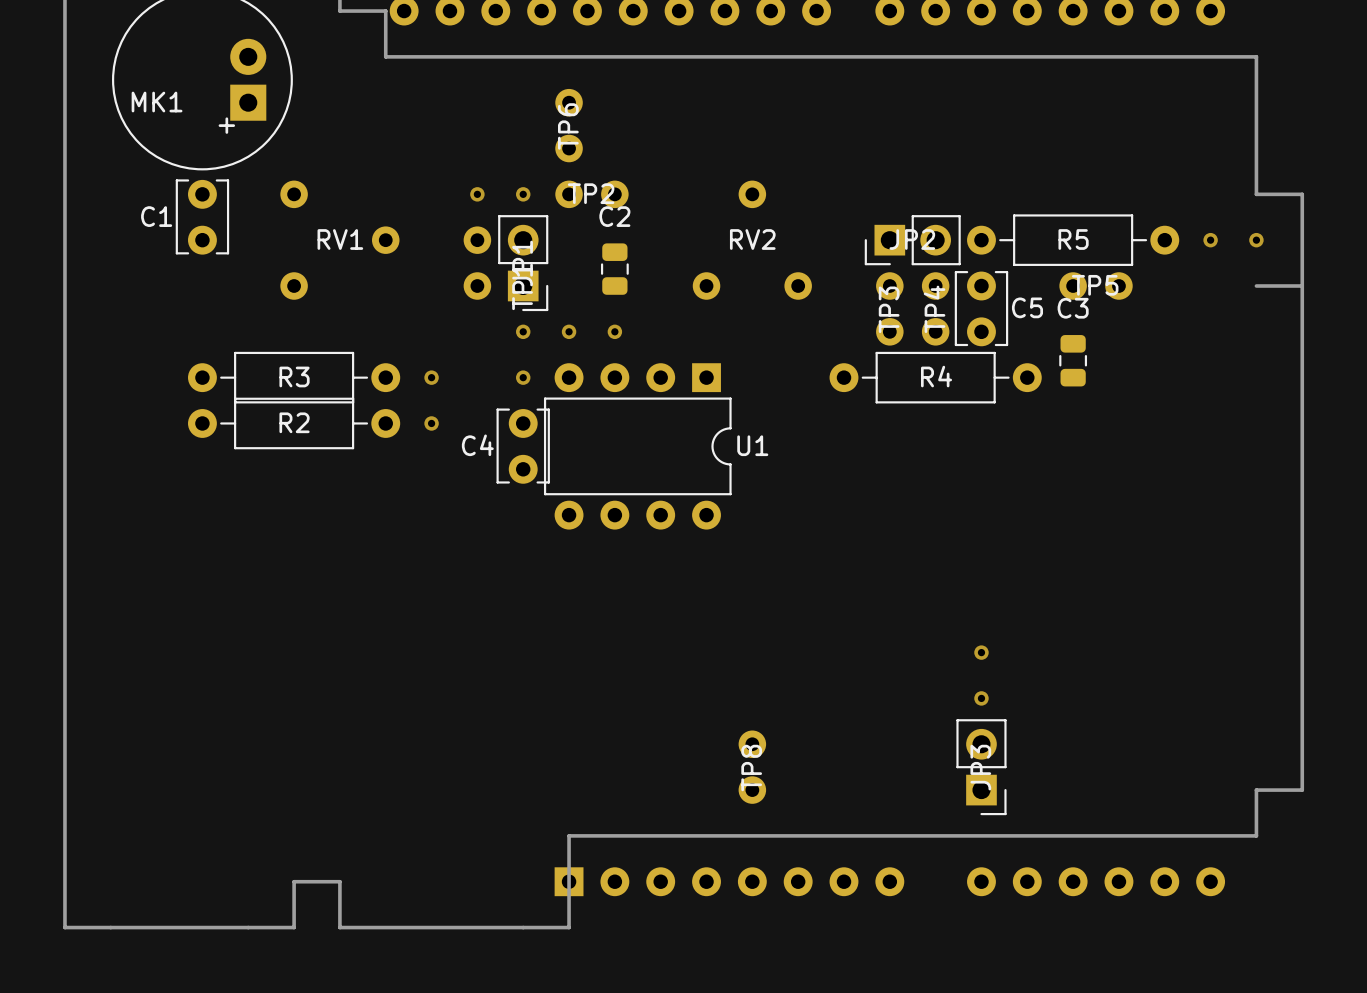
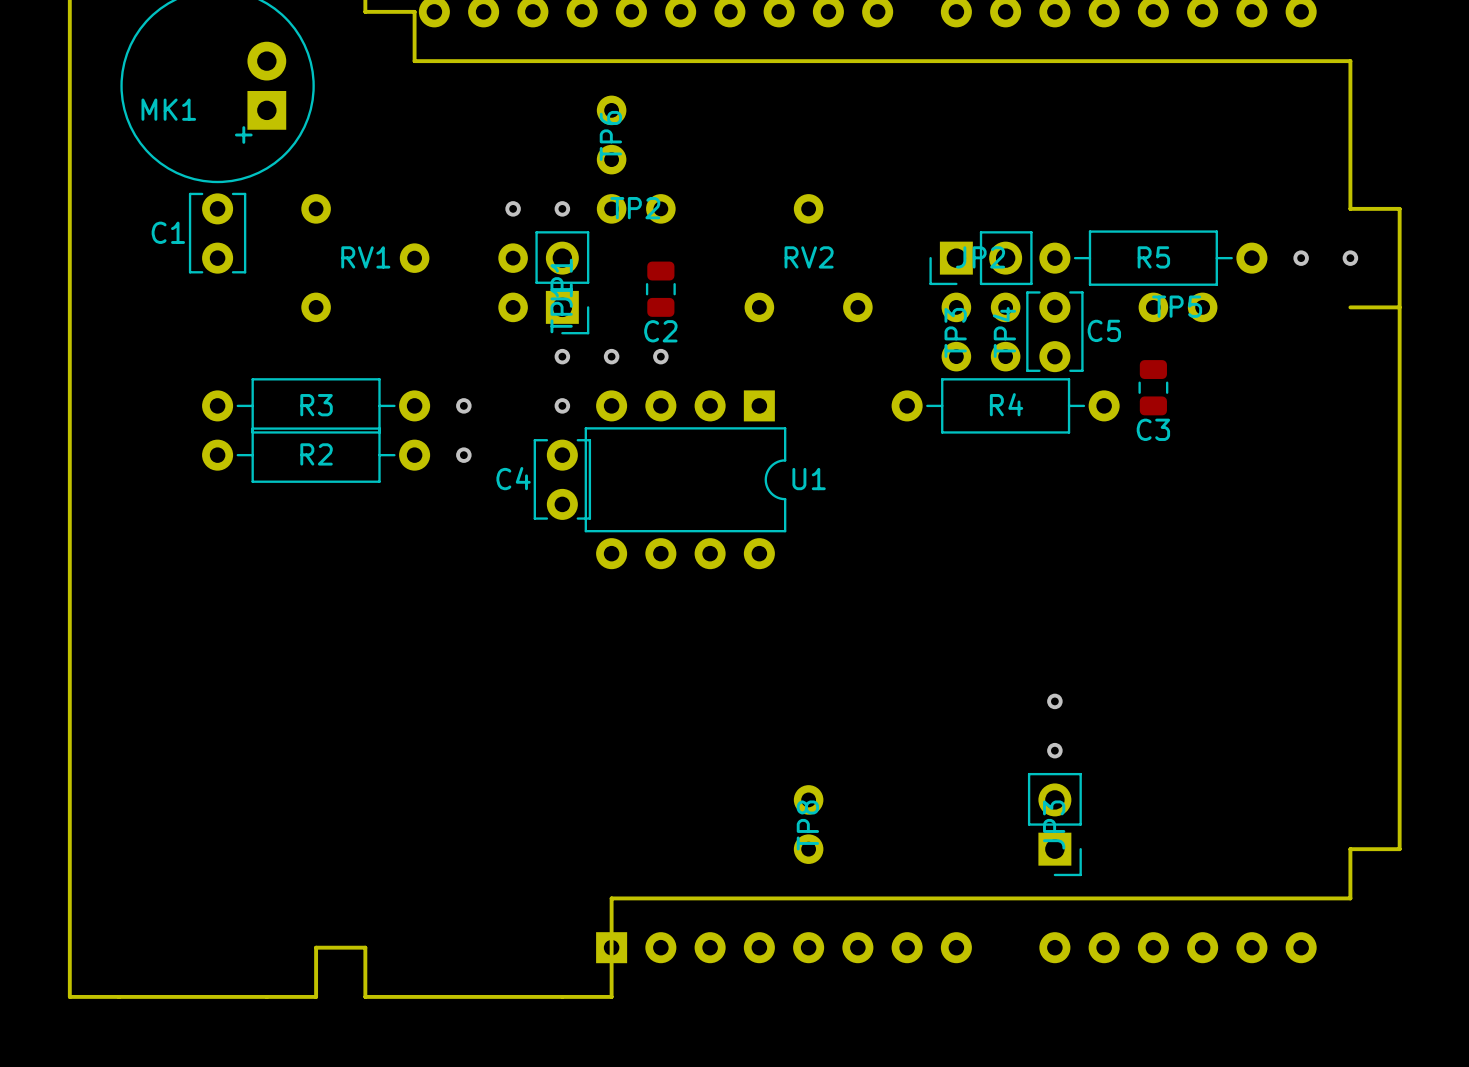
C2 name position: C2 (614, 216) -> C2 (660, 331)
C3 name position: C3 (1073, 308) -> C3 (1153, 429)

